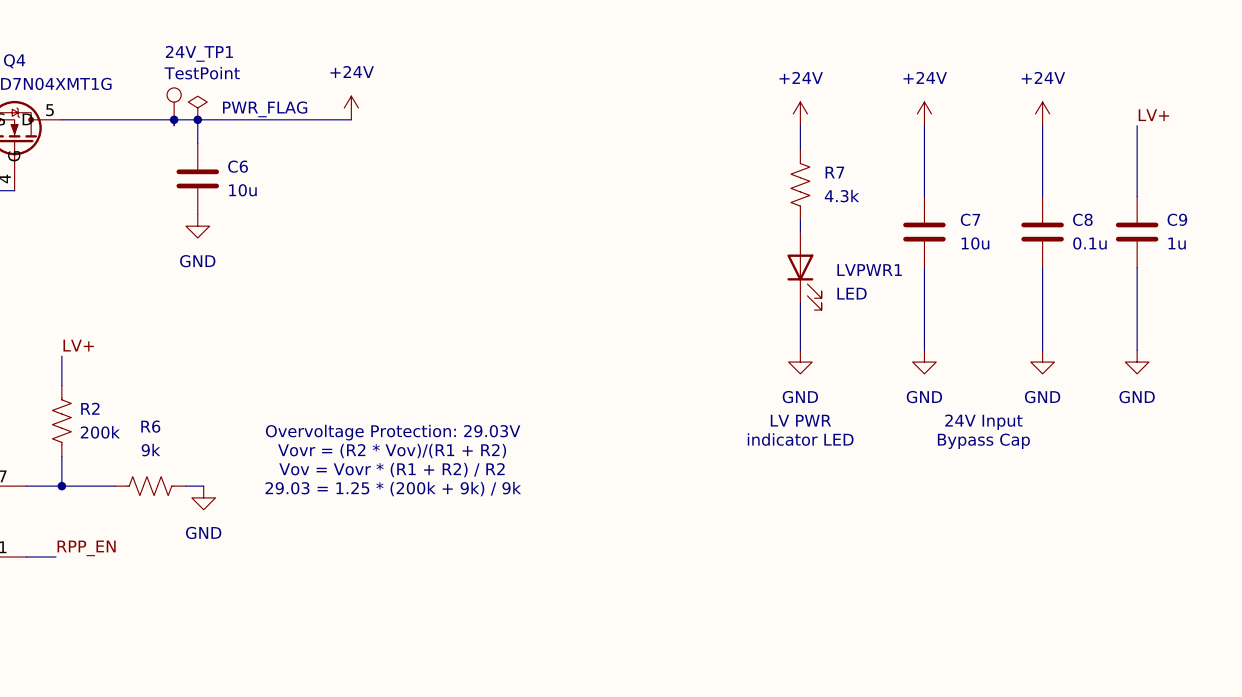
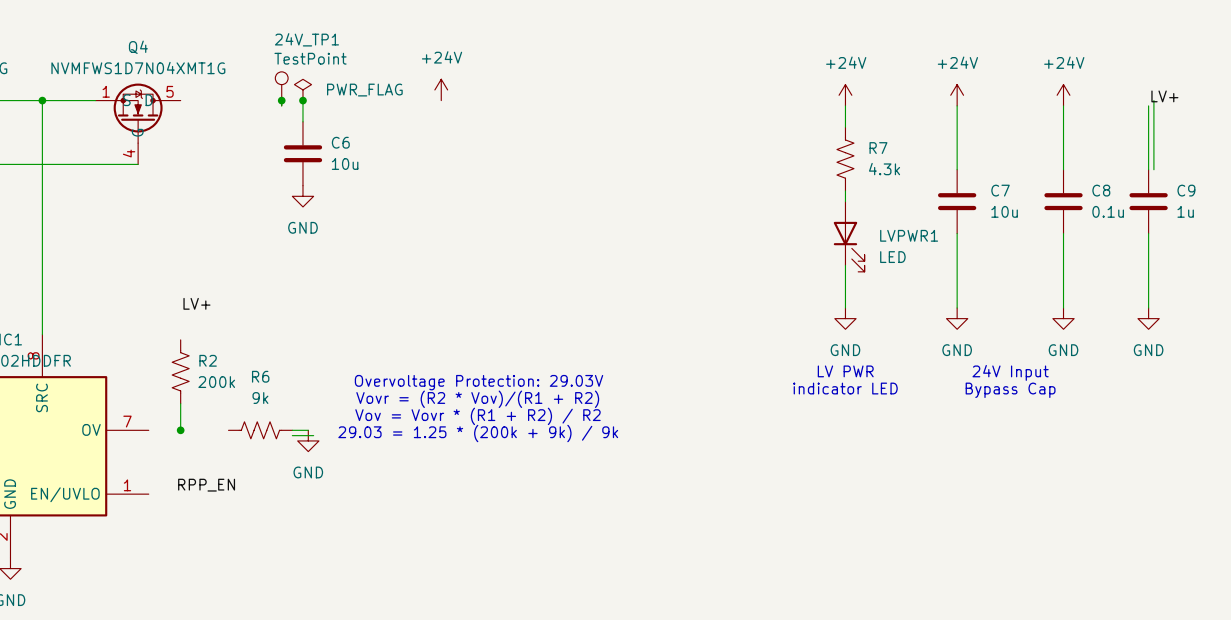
wire: (61, 119) (351, 119) -> none
wire: none -> (1153, 100) (1153, 169)
wire: (61, 356) (61, 385) -> none
wire: (26, 486) (115, 486) -> none
wire: none -> (292, 435) (313, 435)
wire: (26, 557) (55, 557) -> none

